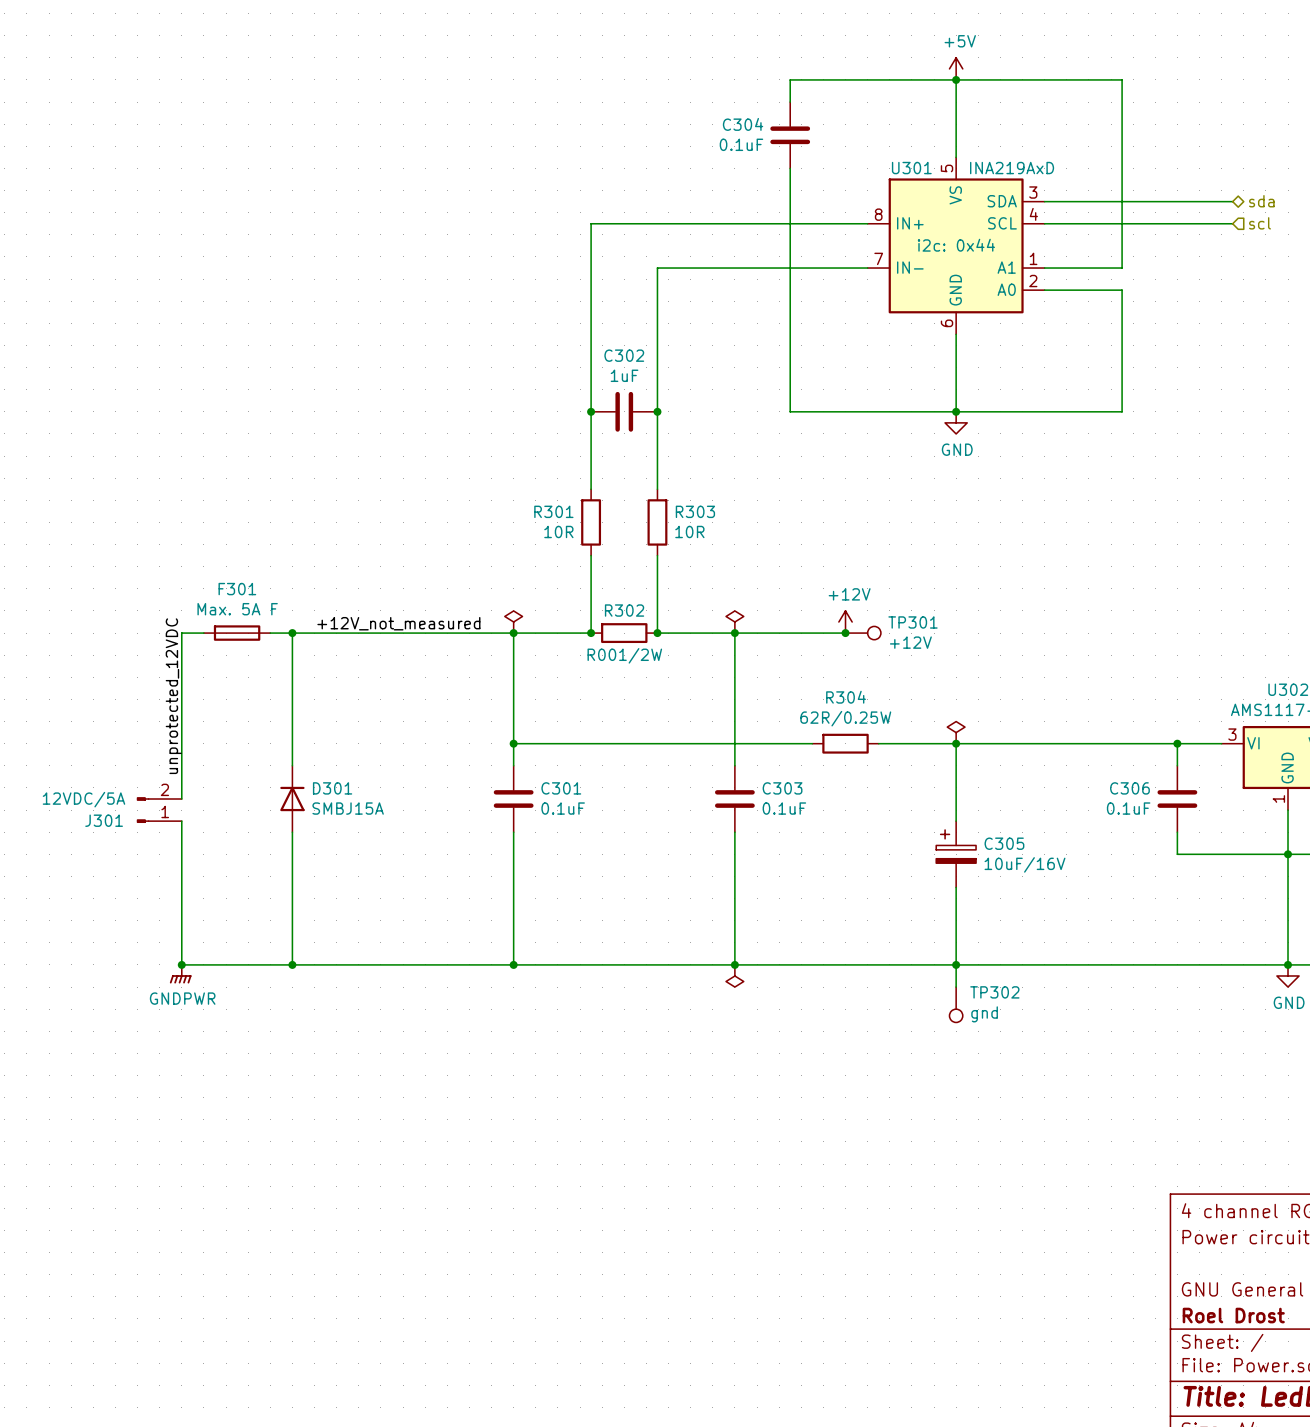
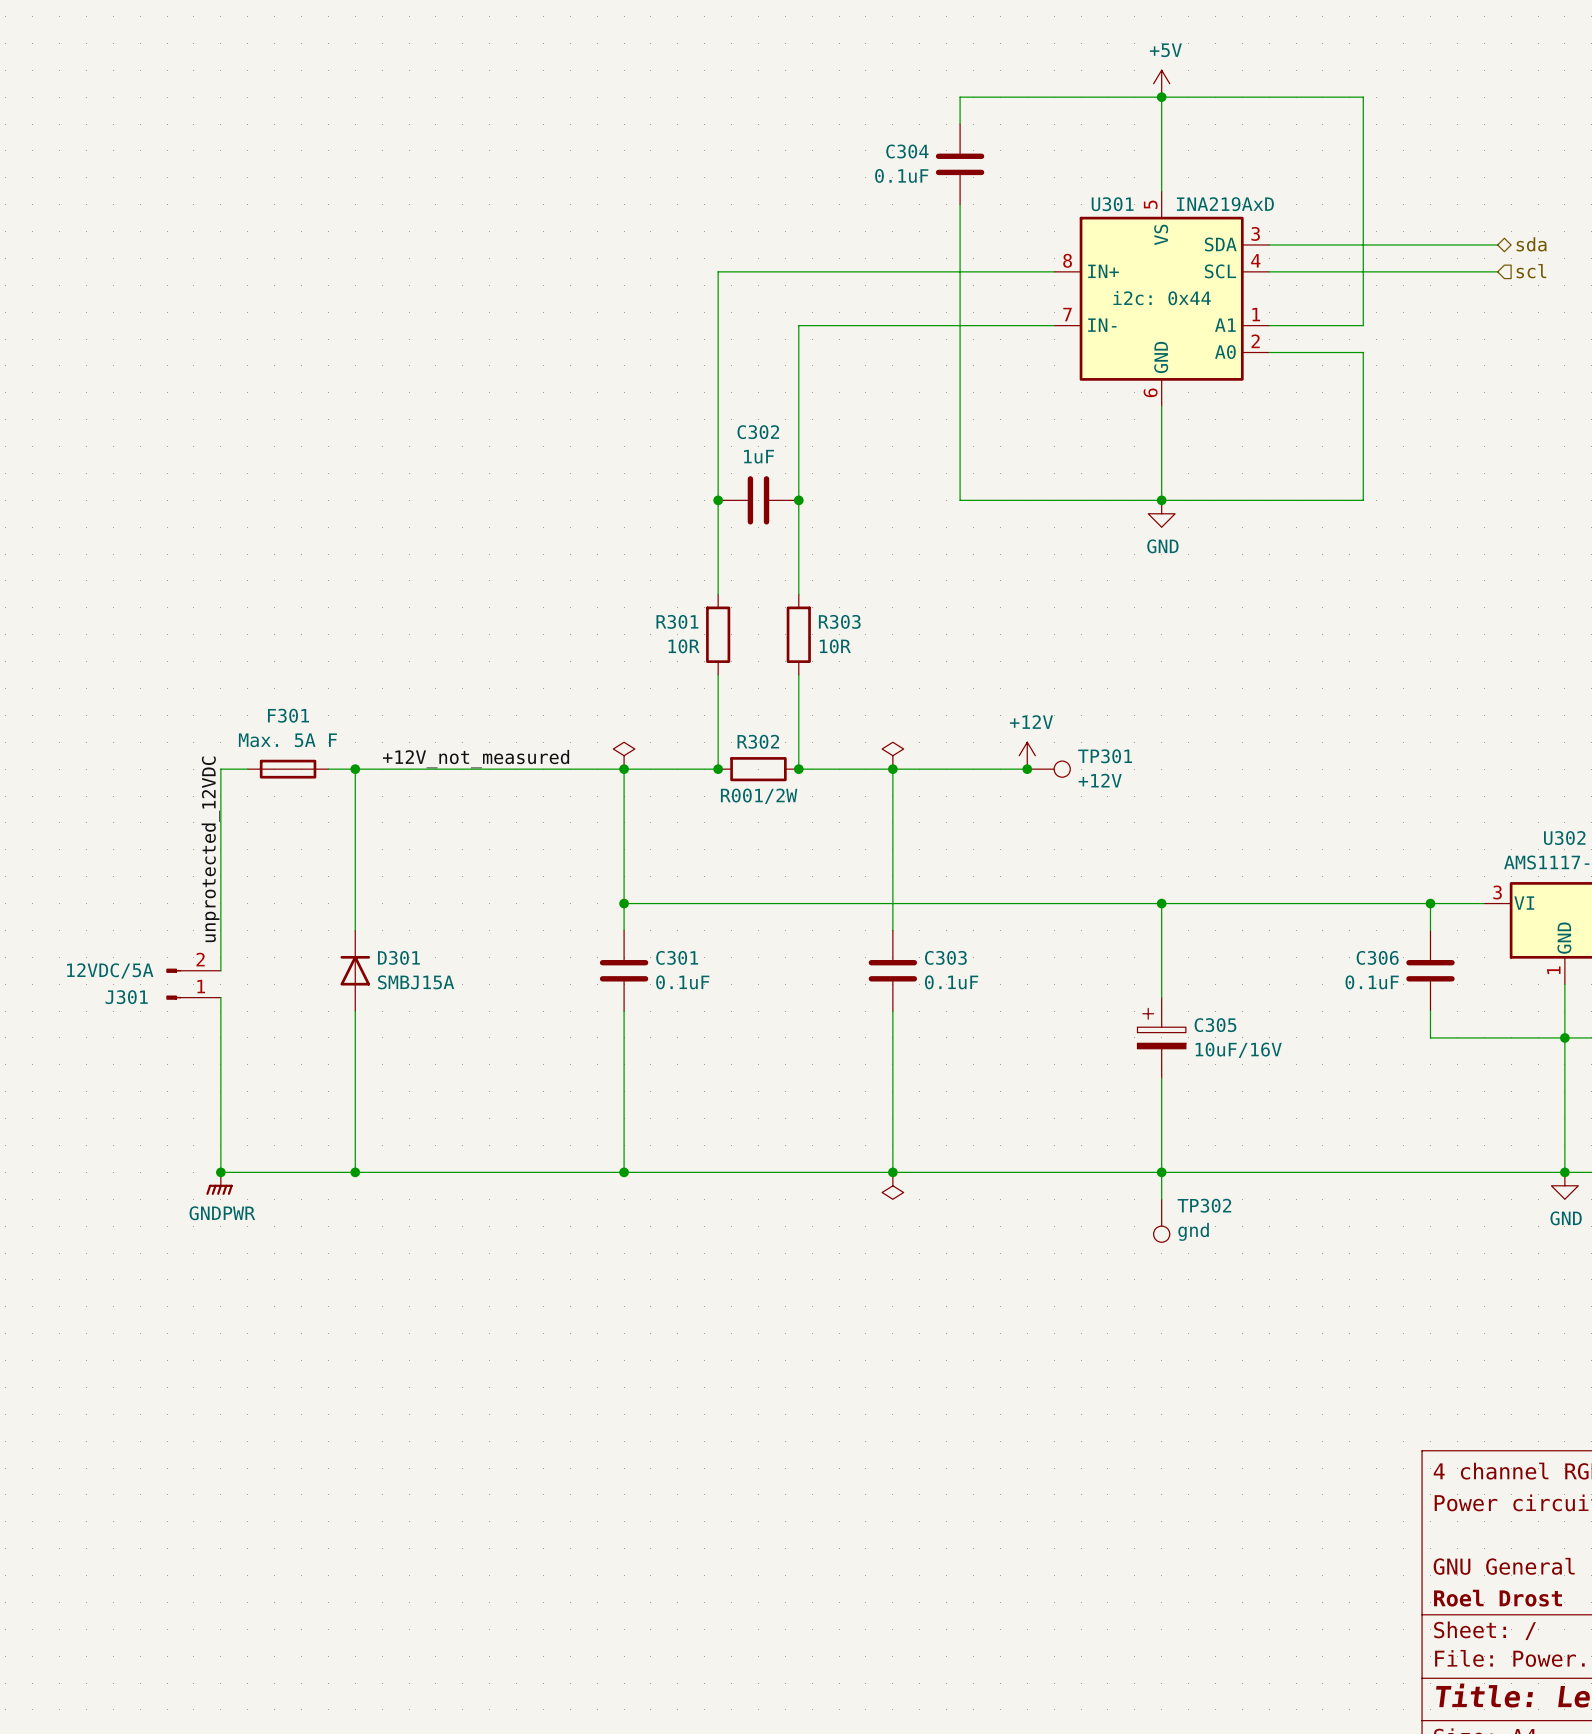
power symbol: (956, 732) -> none
wire: none -> (986, 903) (1067, 903)
R304: 62R/0.25W (845, 743) -> none

